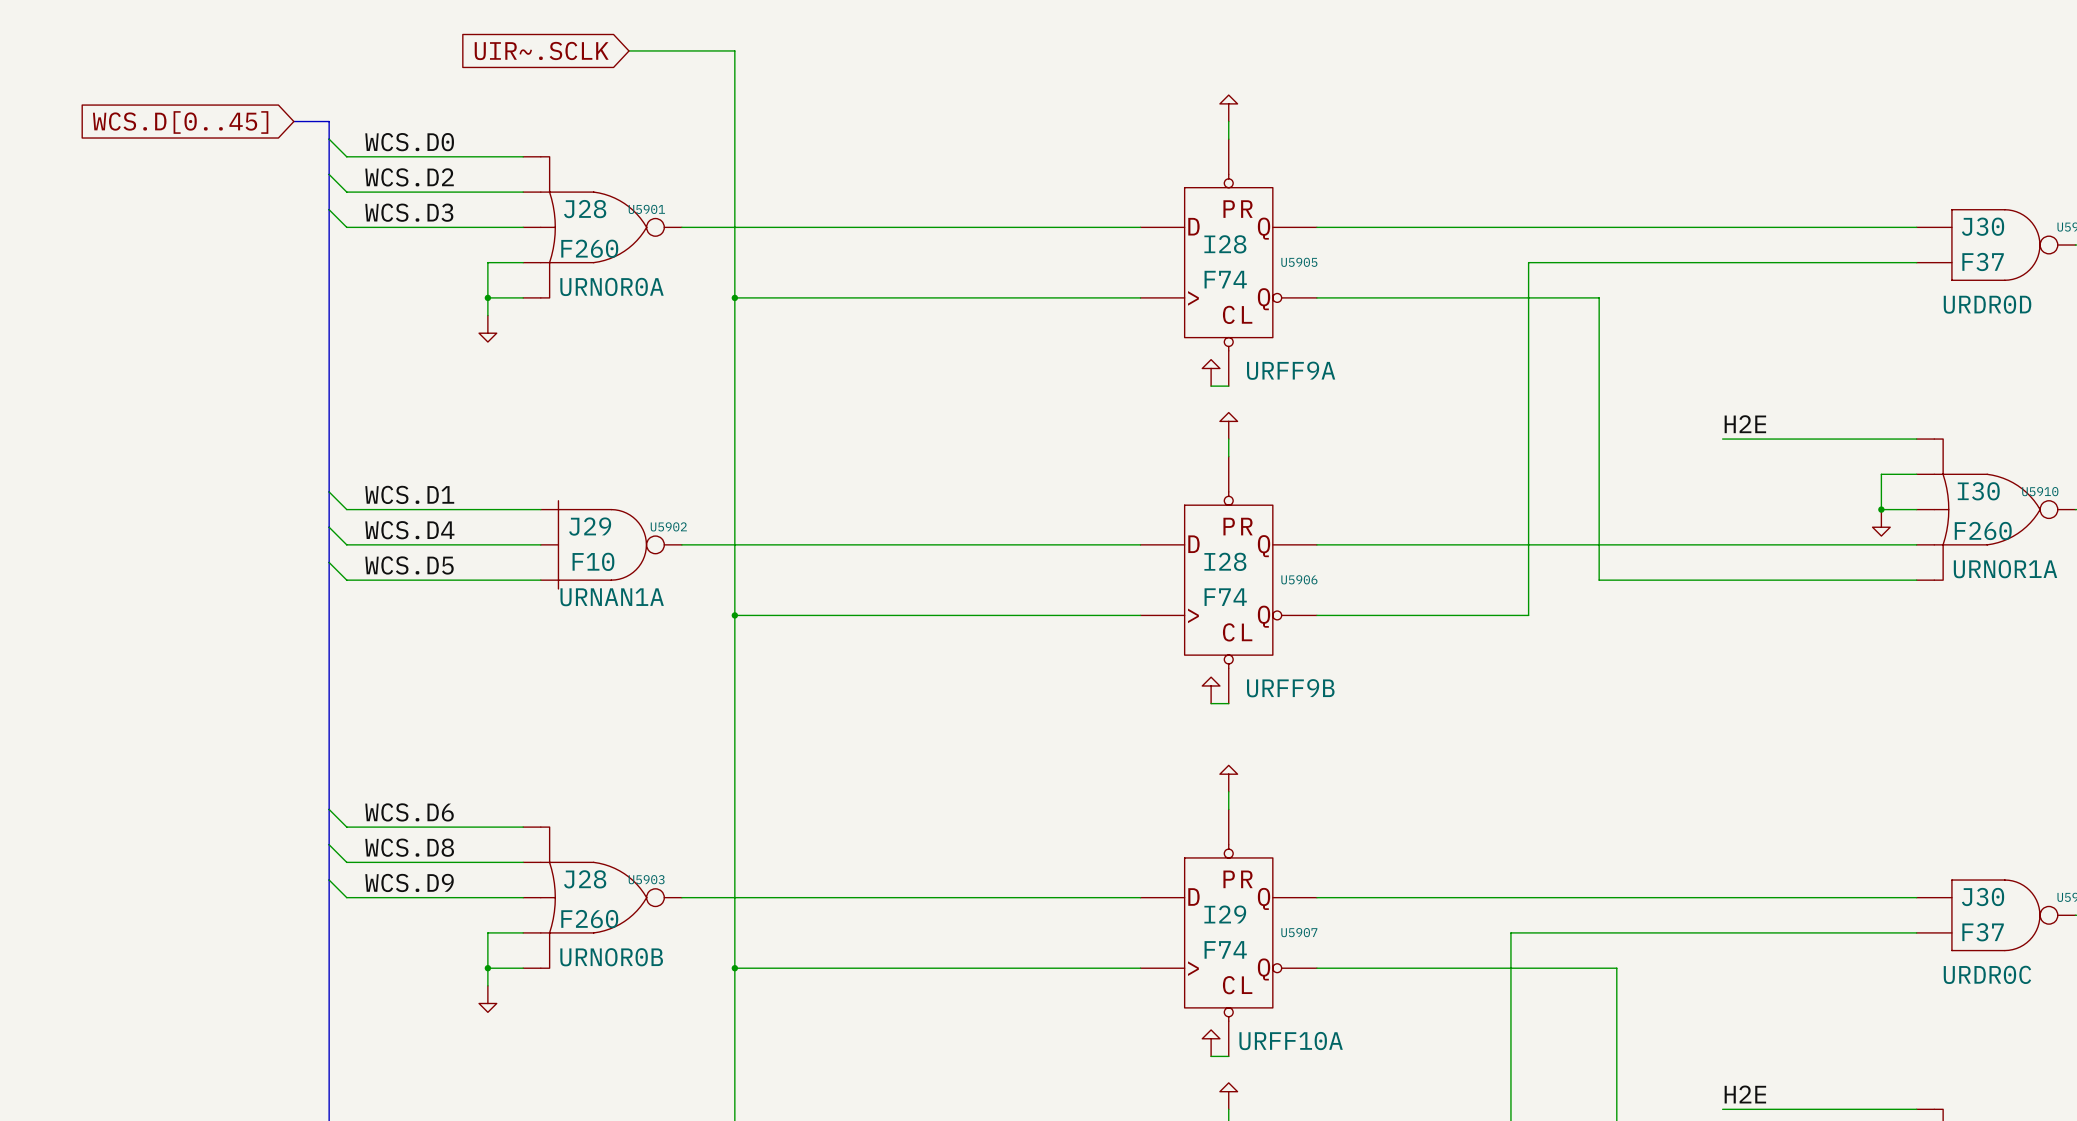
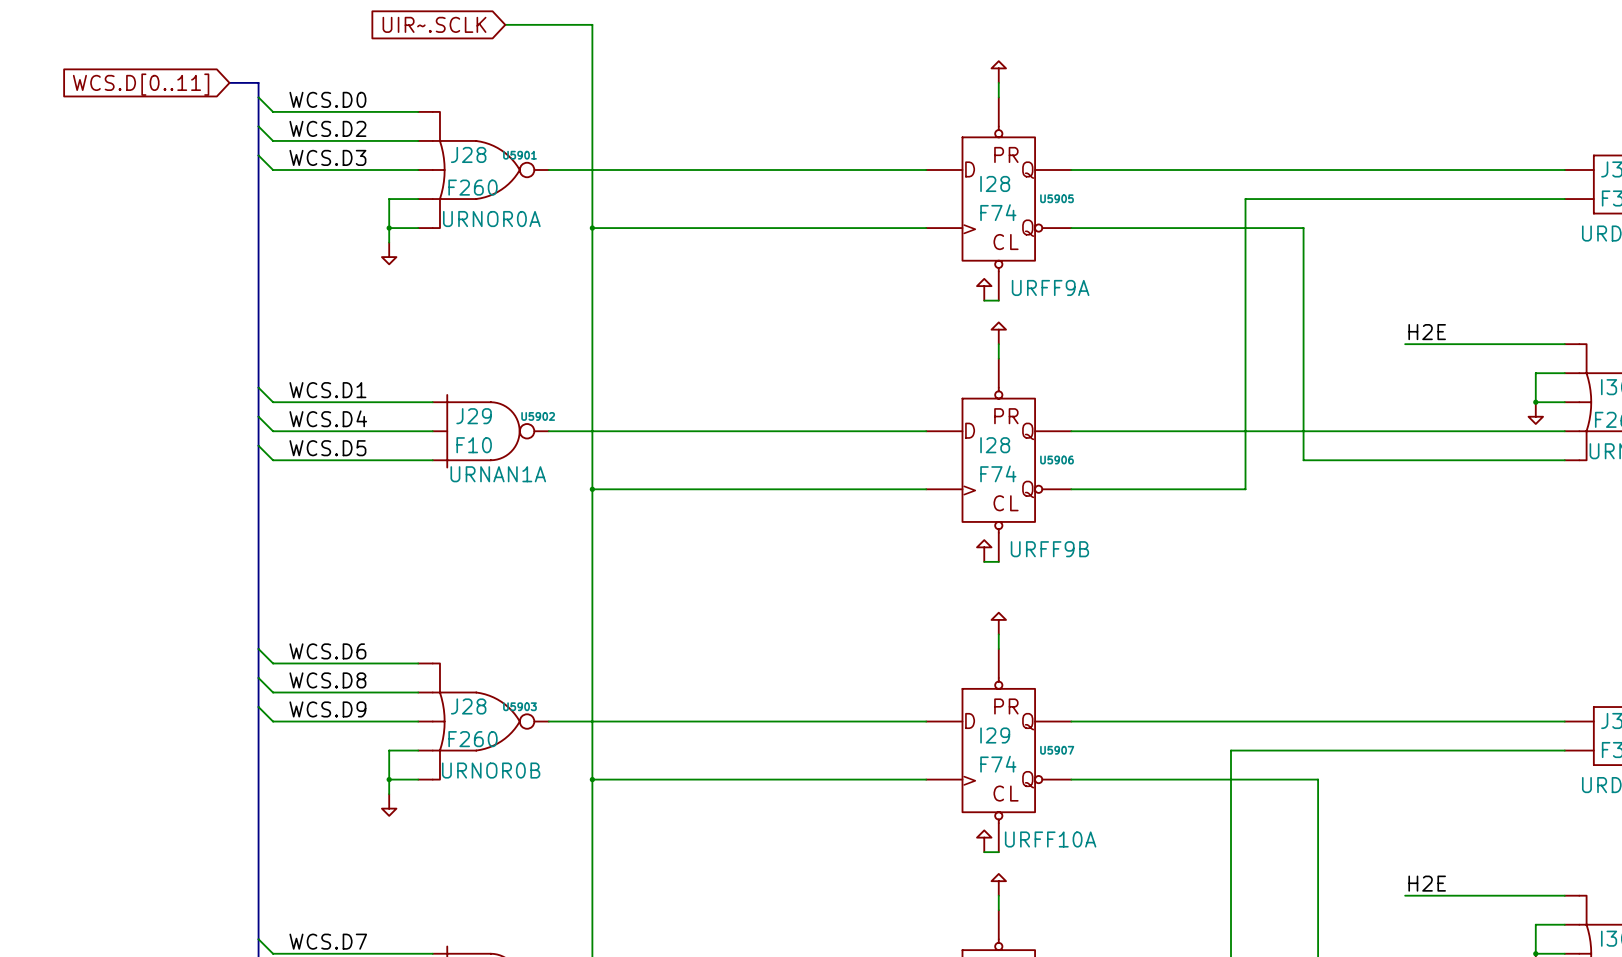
global label: WCS.D[0..45] (180, 122) -> WCS.D[0..11] (141, 84)

